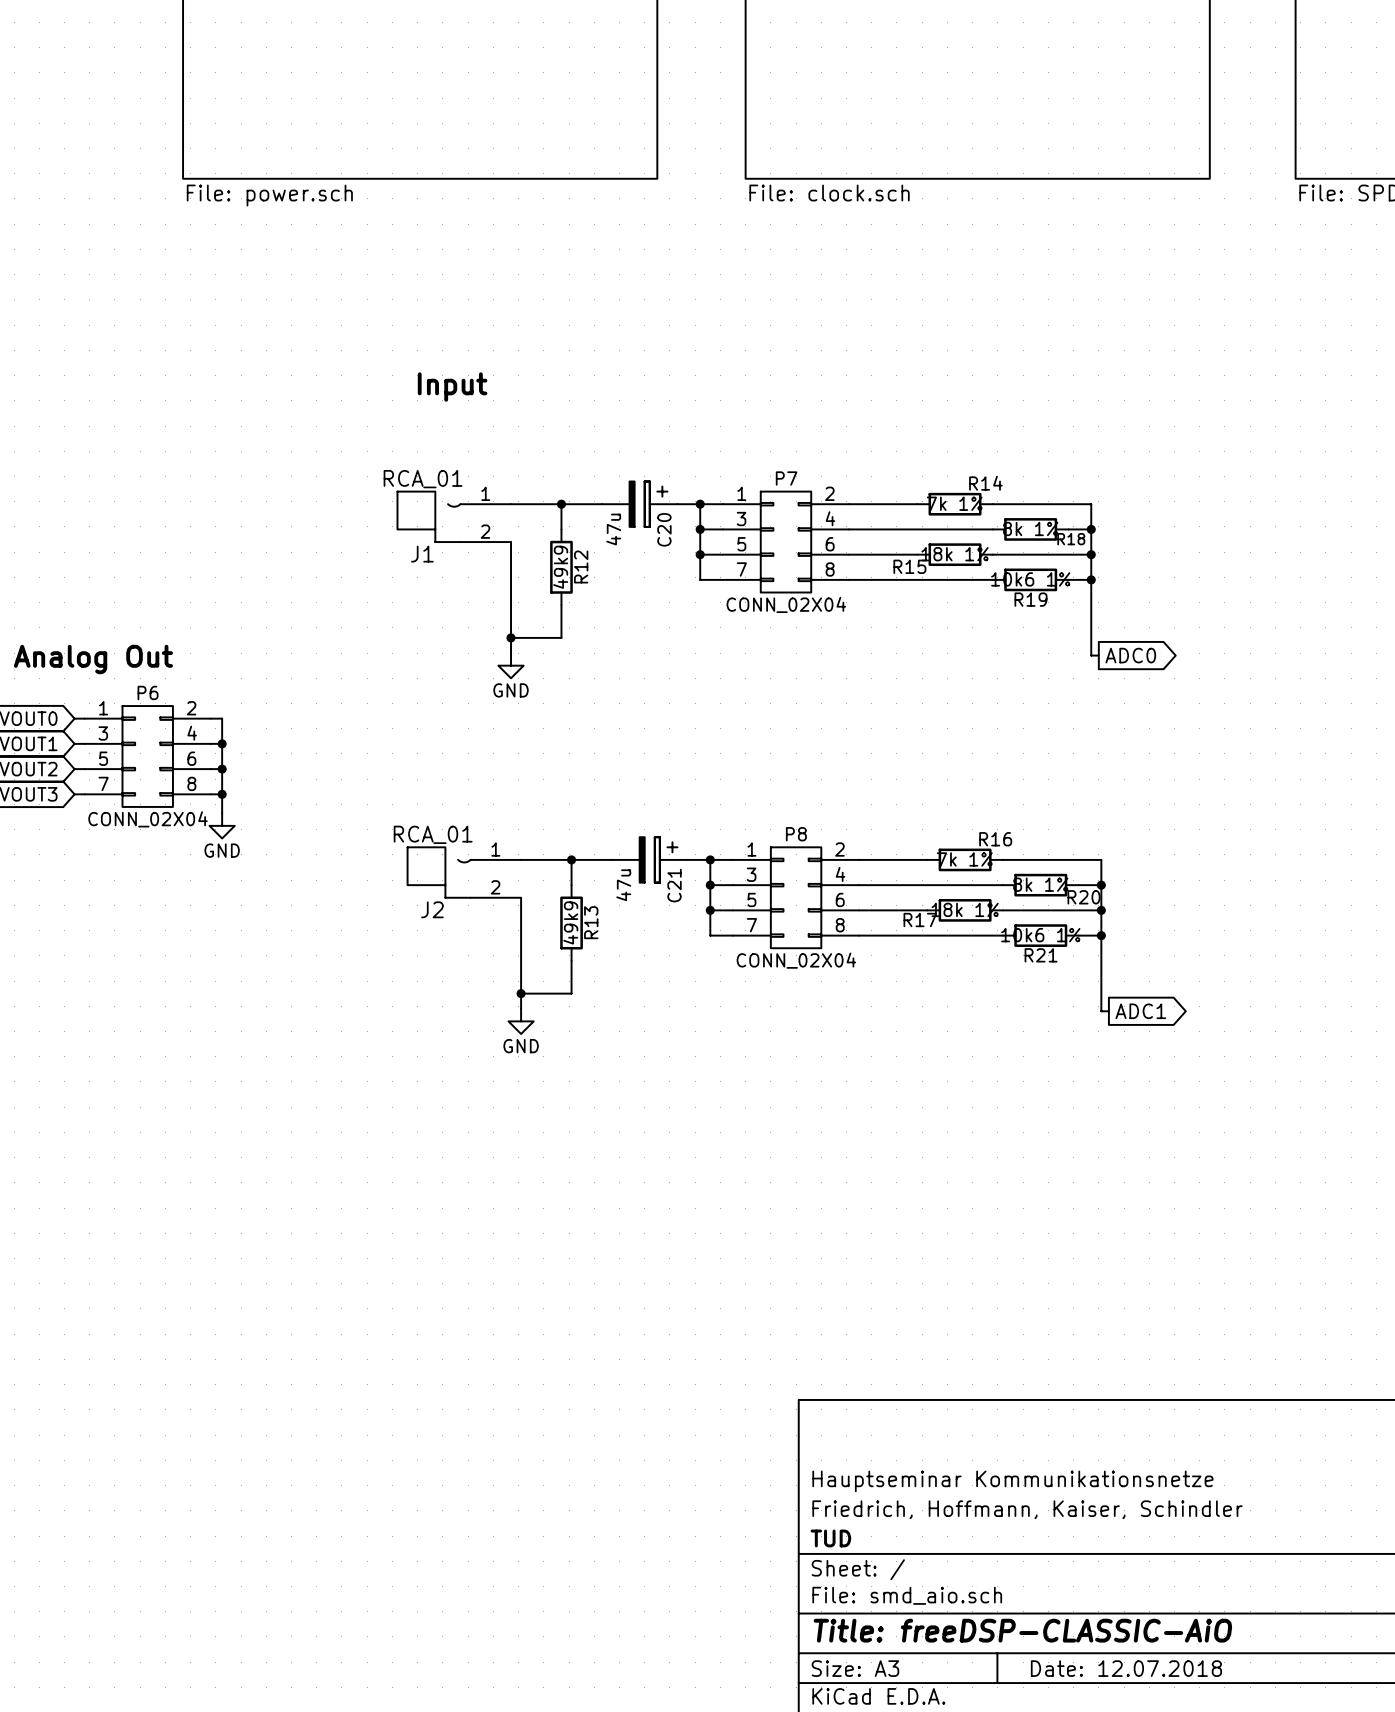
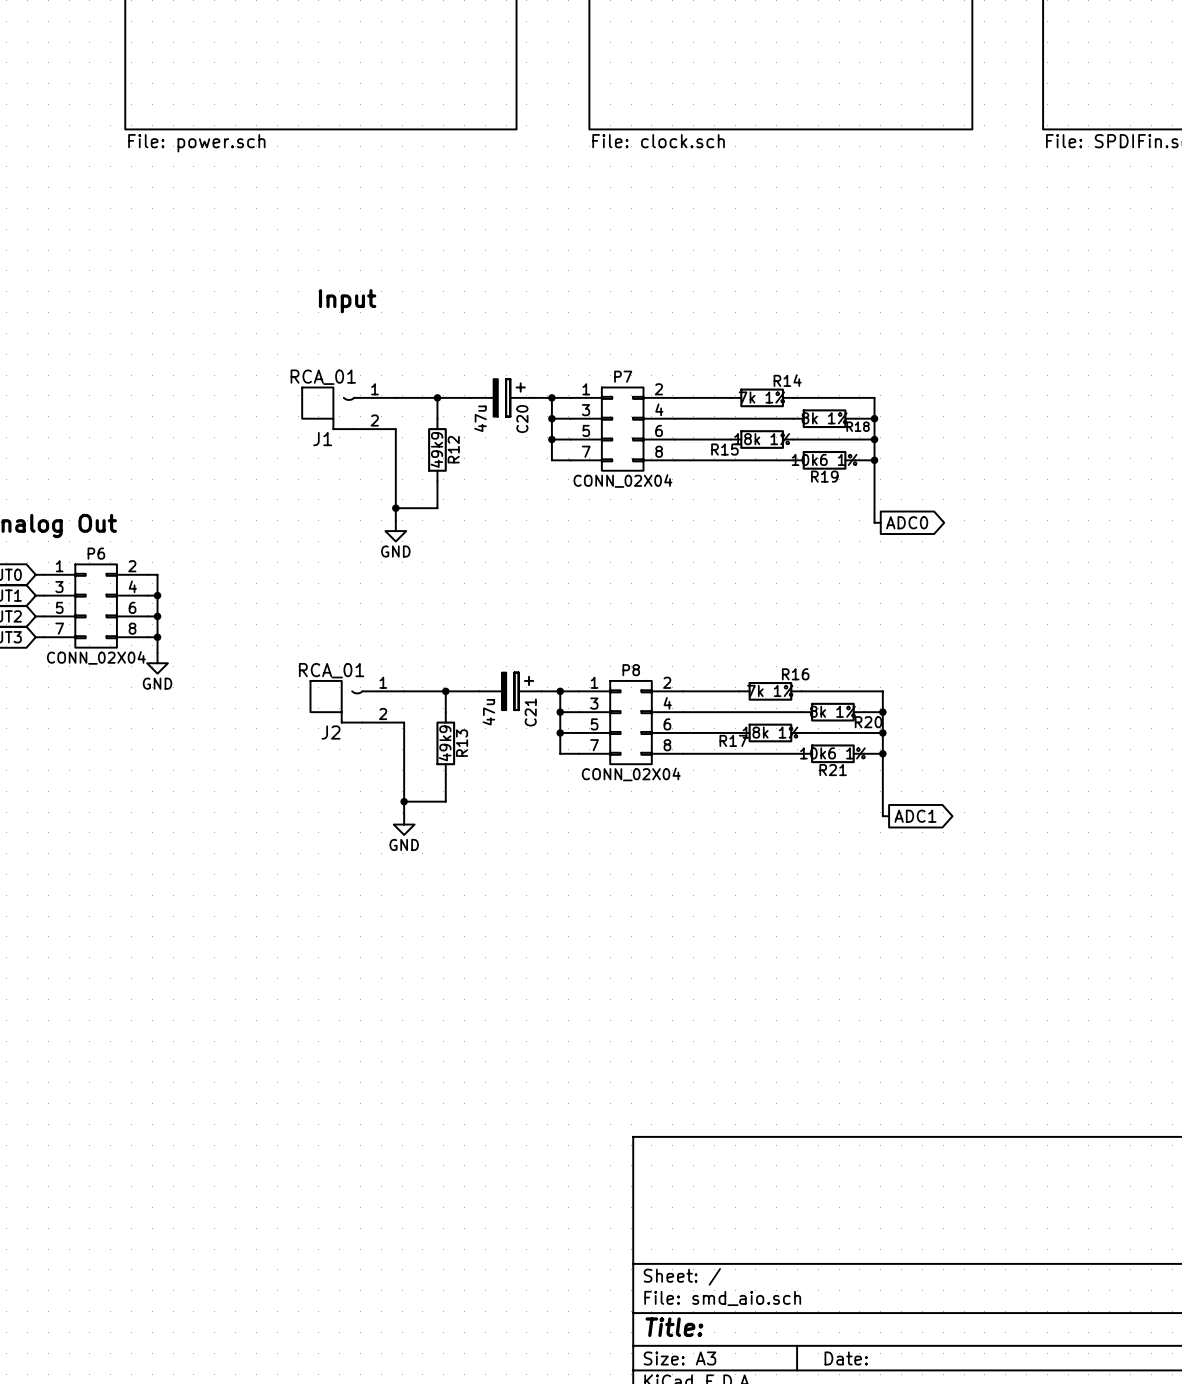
title block: Hauptseminar Kommunikationsnetze (1012, 1481) -> none
title block: Friedrich, Hoffmann, Kaiser, Schindler (1027, 1509) -> none
title block: TUD (830, 1538) -> none
title block: Title: freeDSP-CLASSIC-AiO (1022, 1630) -> Title: (674, 1327)
title block: Date: 12.07.2018 (1126, 1668) -> Date: (846, 1358)

